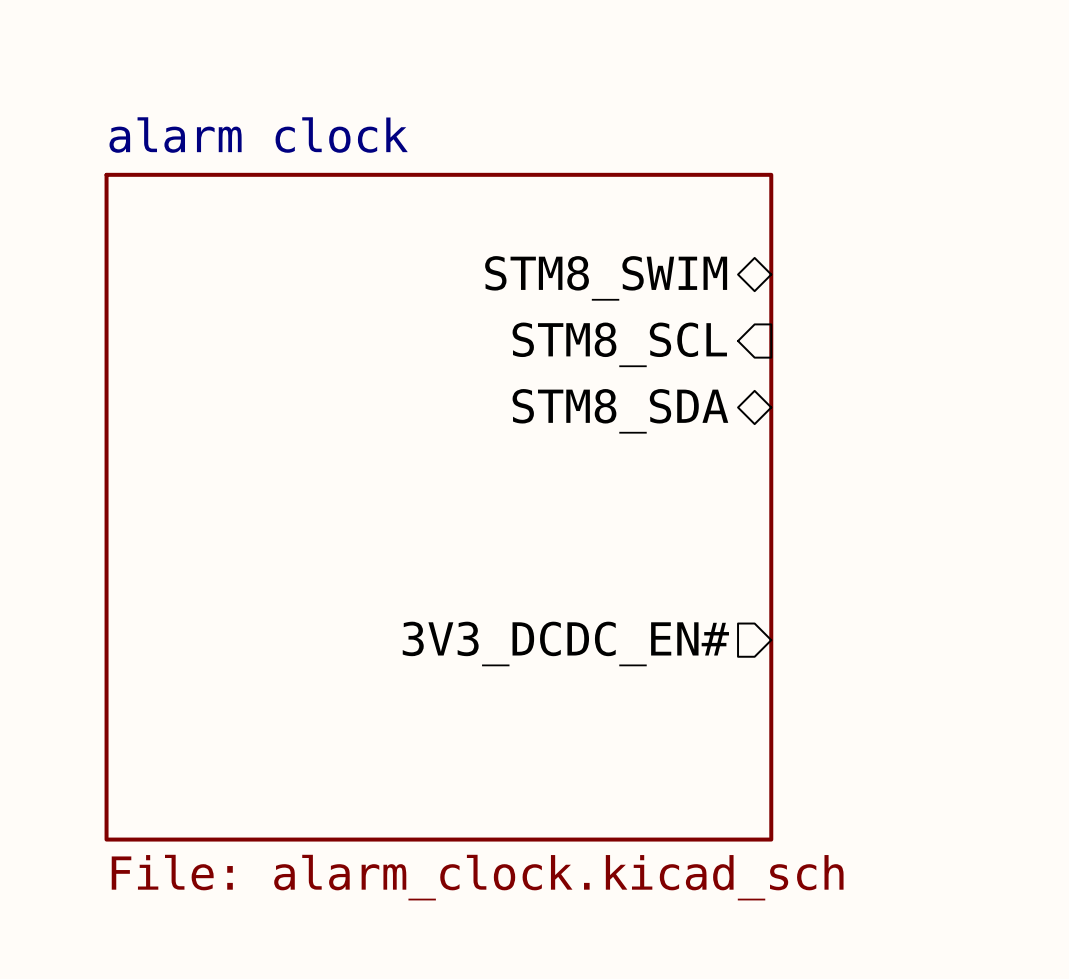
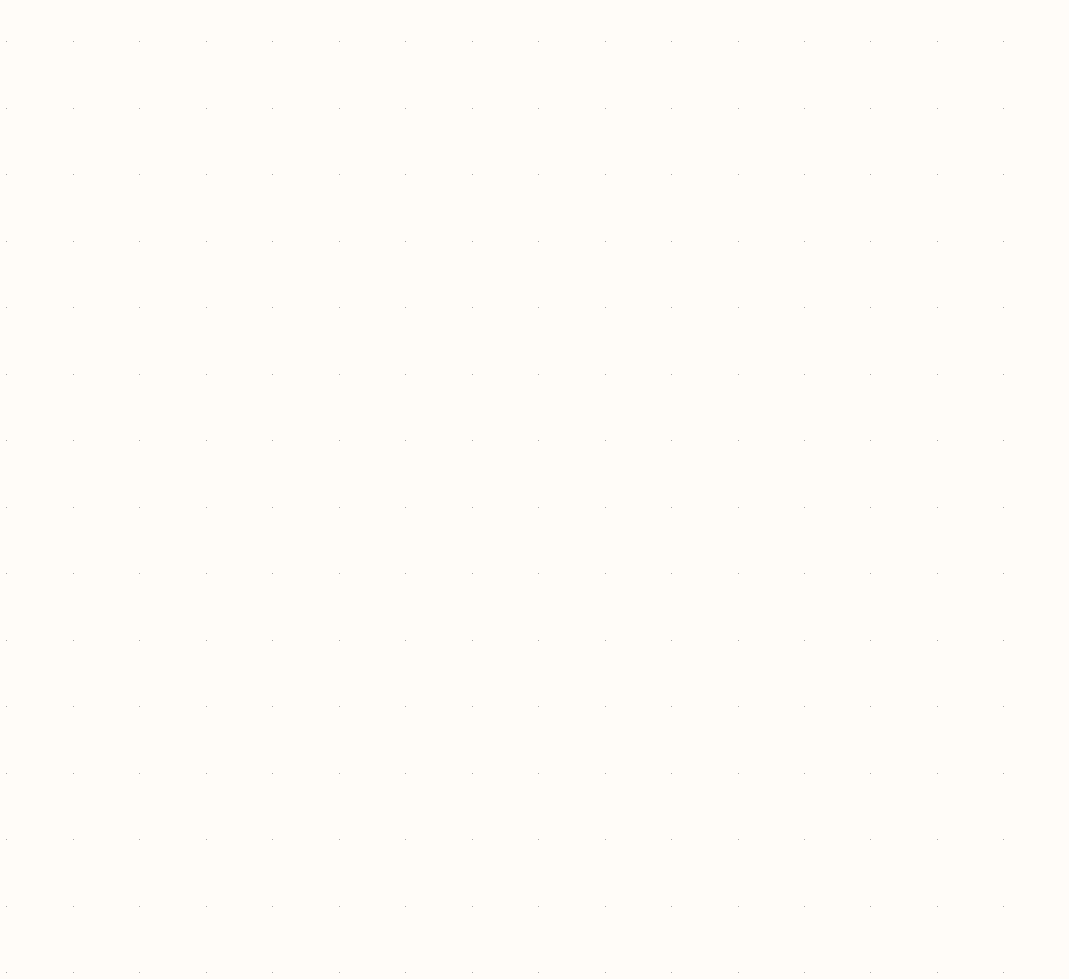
sheet pin: STM8_SWIM (606, 278) -> none
sheet pin: STM8_SCL (619, 344) -> none
sheet pin: STM8_SDA (620, 411) -> none
sheet alarm clock: File: alarm_clock.kicad_sch (438, 507) -> none
sheet pin: 3V3_DCDC_EN# (565, 643) -> none

